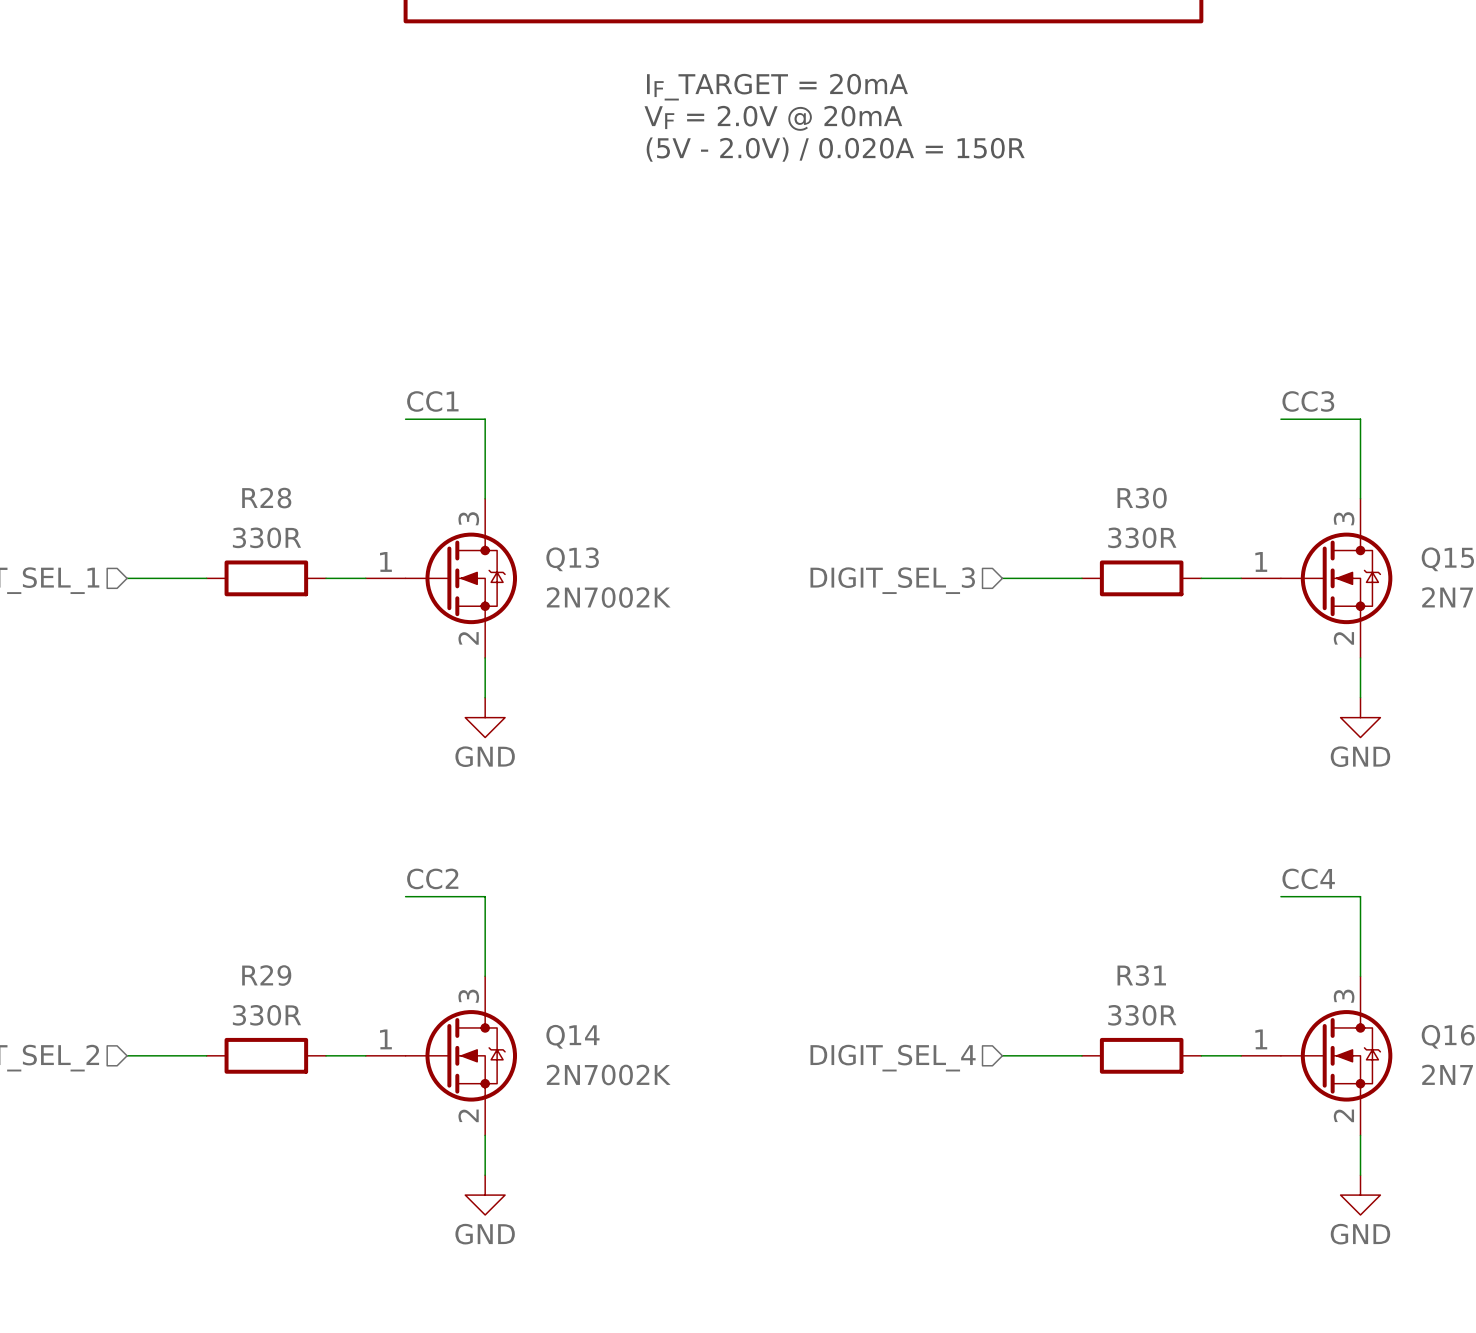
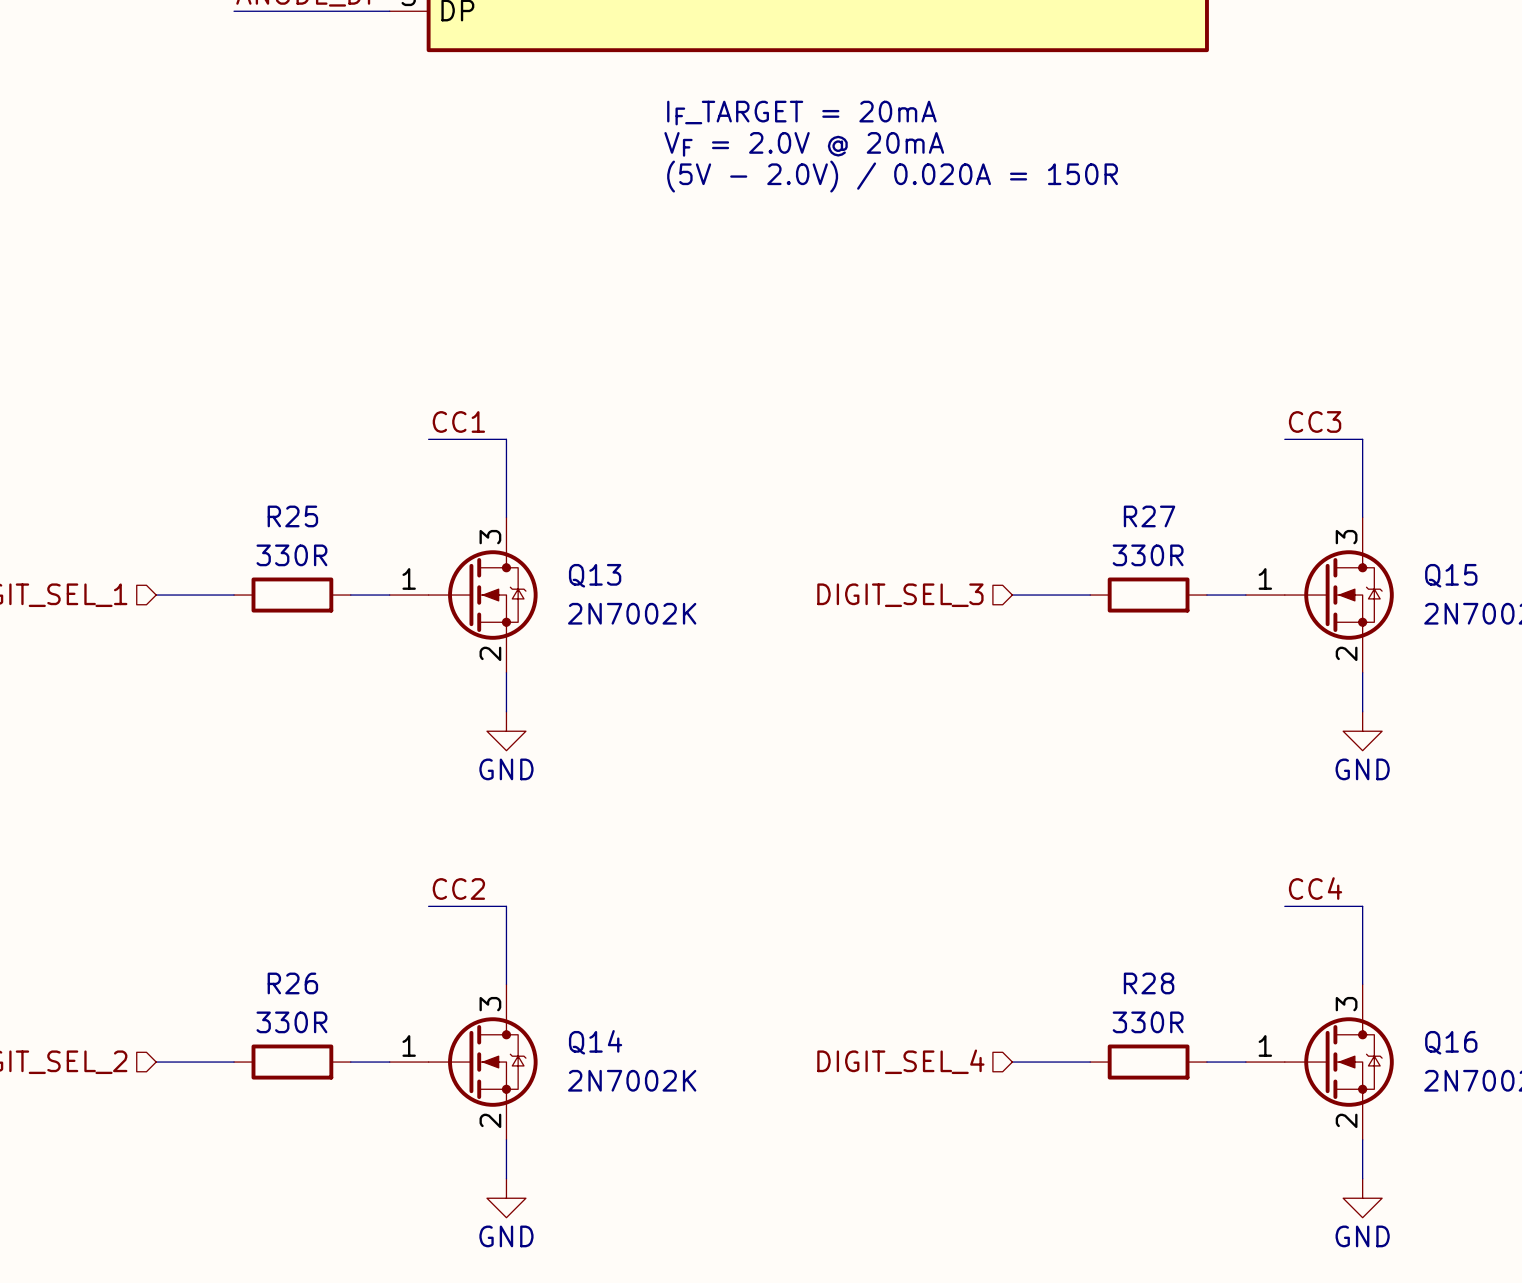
R28 name: R28 (266, 498) -> R25 (292, 516)
R30 name: R30 (1142, 498) -> R27 (1149, 516)
R29 name: R29 (266, 975) -> R26 (292, 983)
R31 name: R31 (1141, 975) -> R28 (1149, 983)

